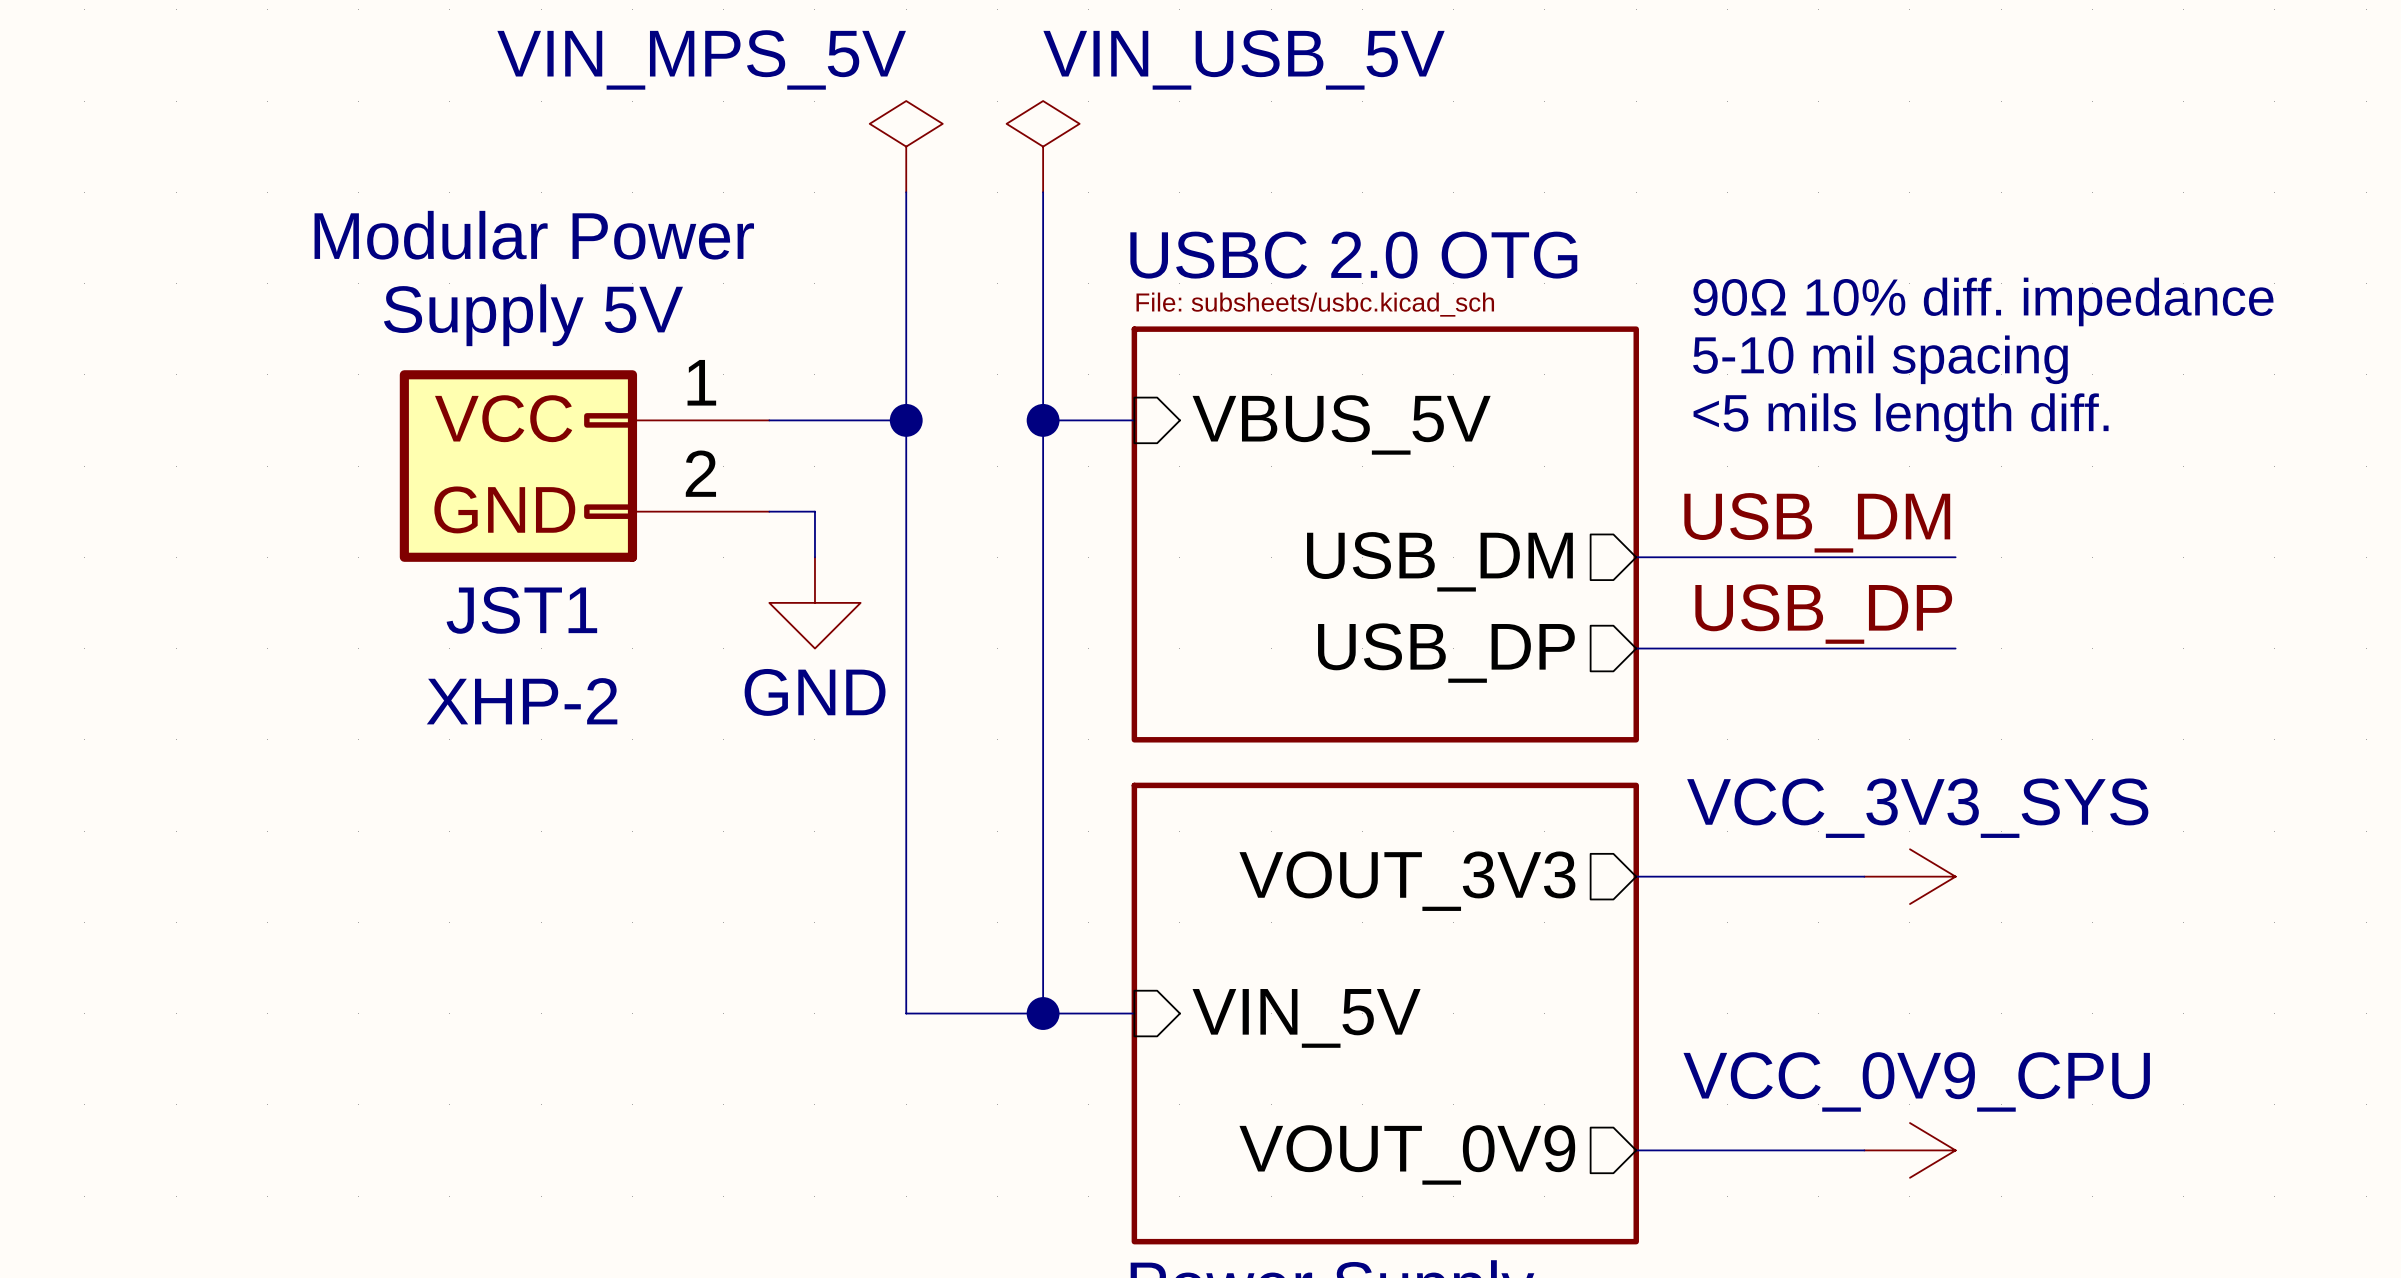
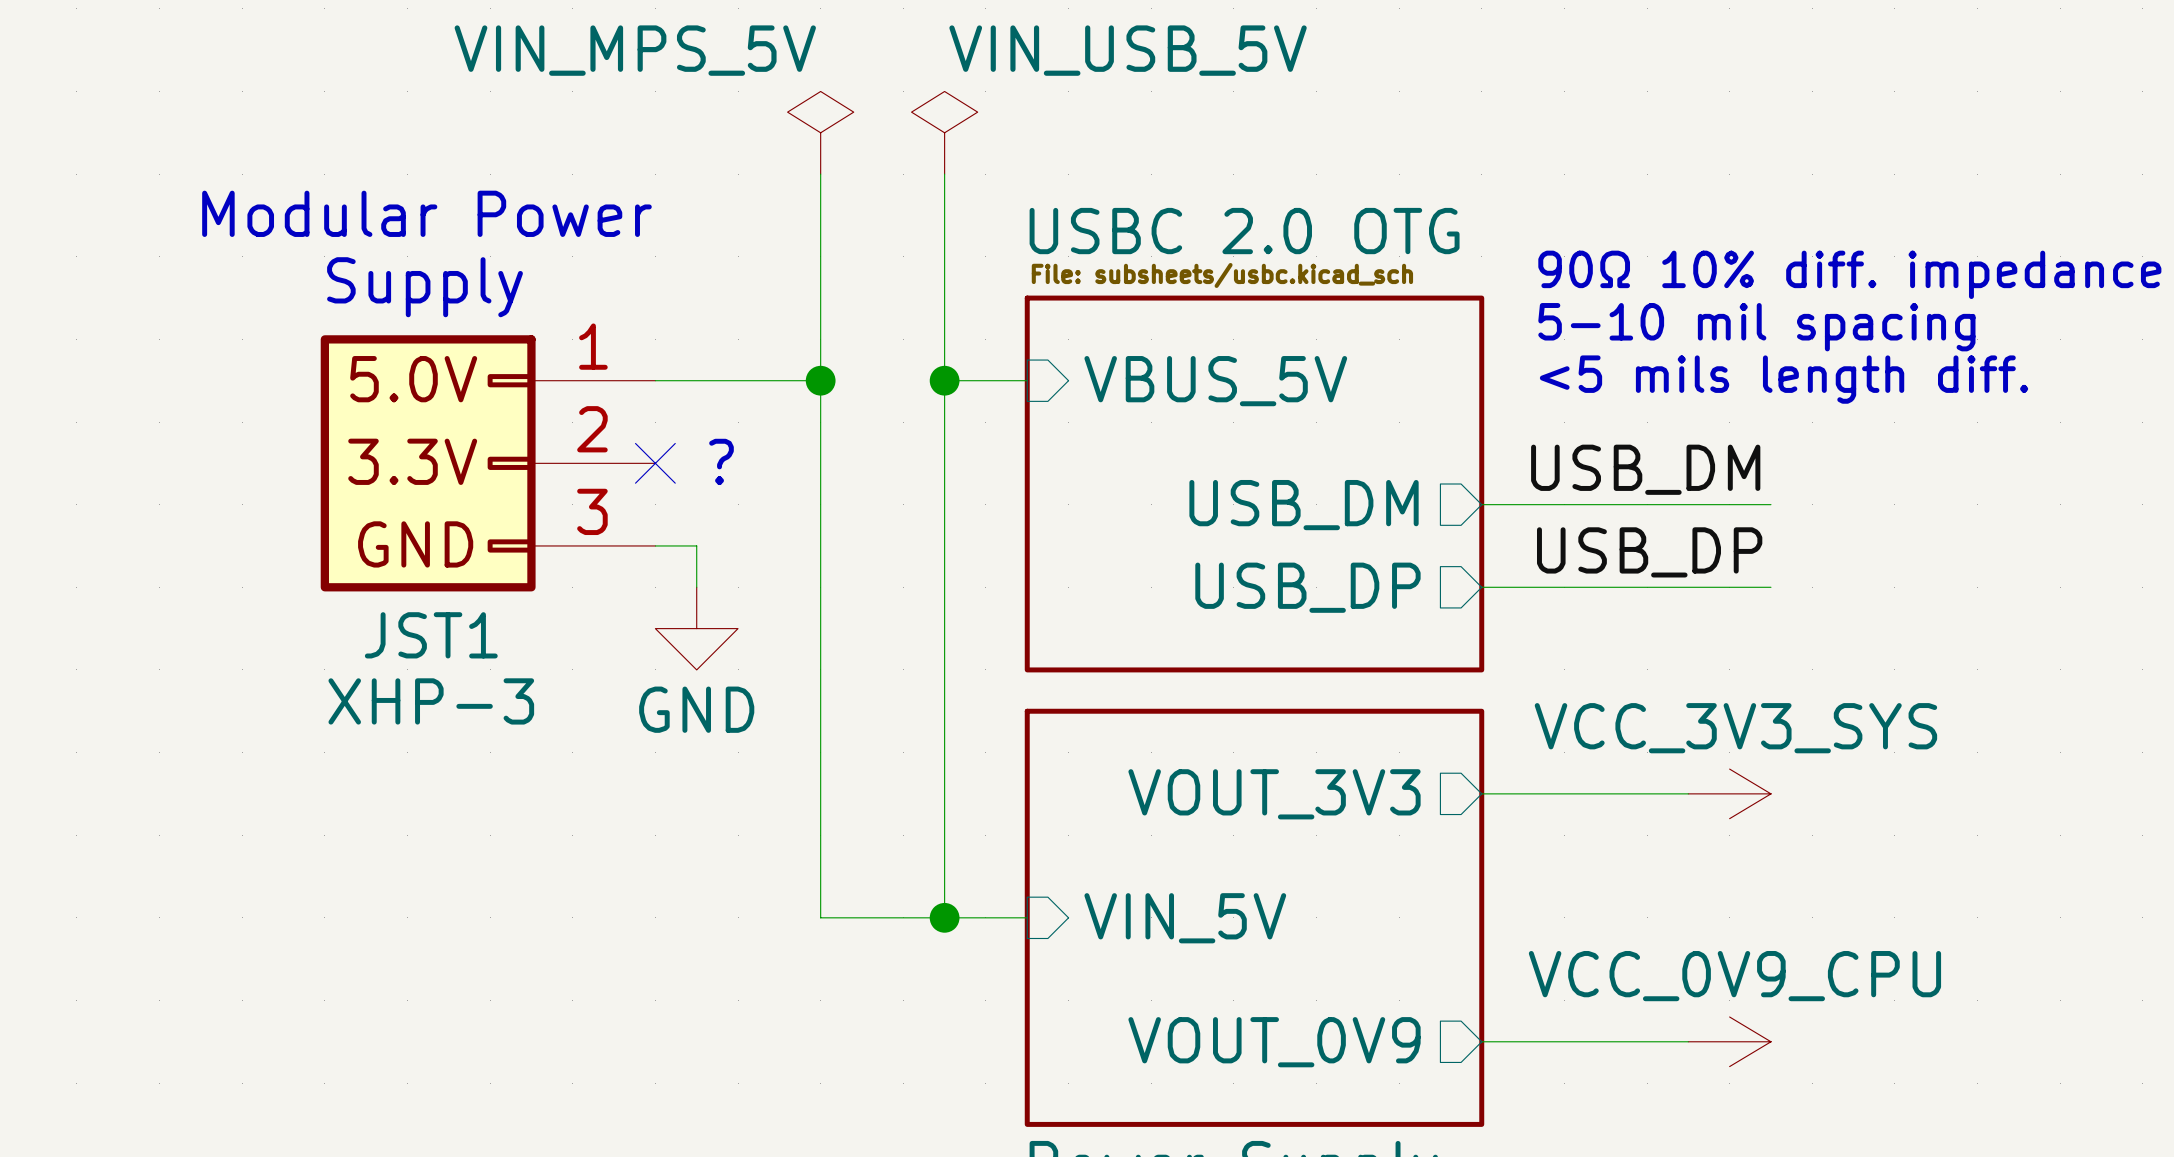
text position: Modular Power (534, 235) -> Modular Power (426, 213)
text: Supply 5V (533, 315) -> Supply (425, 287)
JST1 symbol: [399, 370, 770, 562] -> [320, 335, 656, 592]
text: none -> ? (721, 461)
no-connect mark: none -> (655, 463)
wire: (769, 511) (814, 511) (814, 557) -> (655, 545) (696, 545) (696, 587)
power symbol position: GND (814, 602) -> GND (696, 628)
JST1 value: XHP-2 (522, 701) -> XHP-3 (431, 701)

